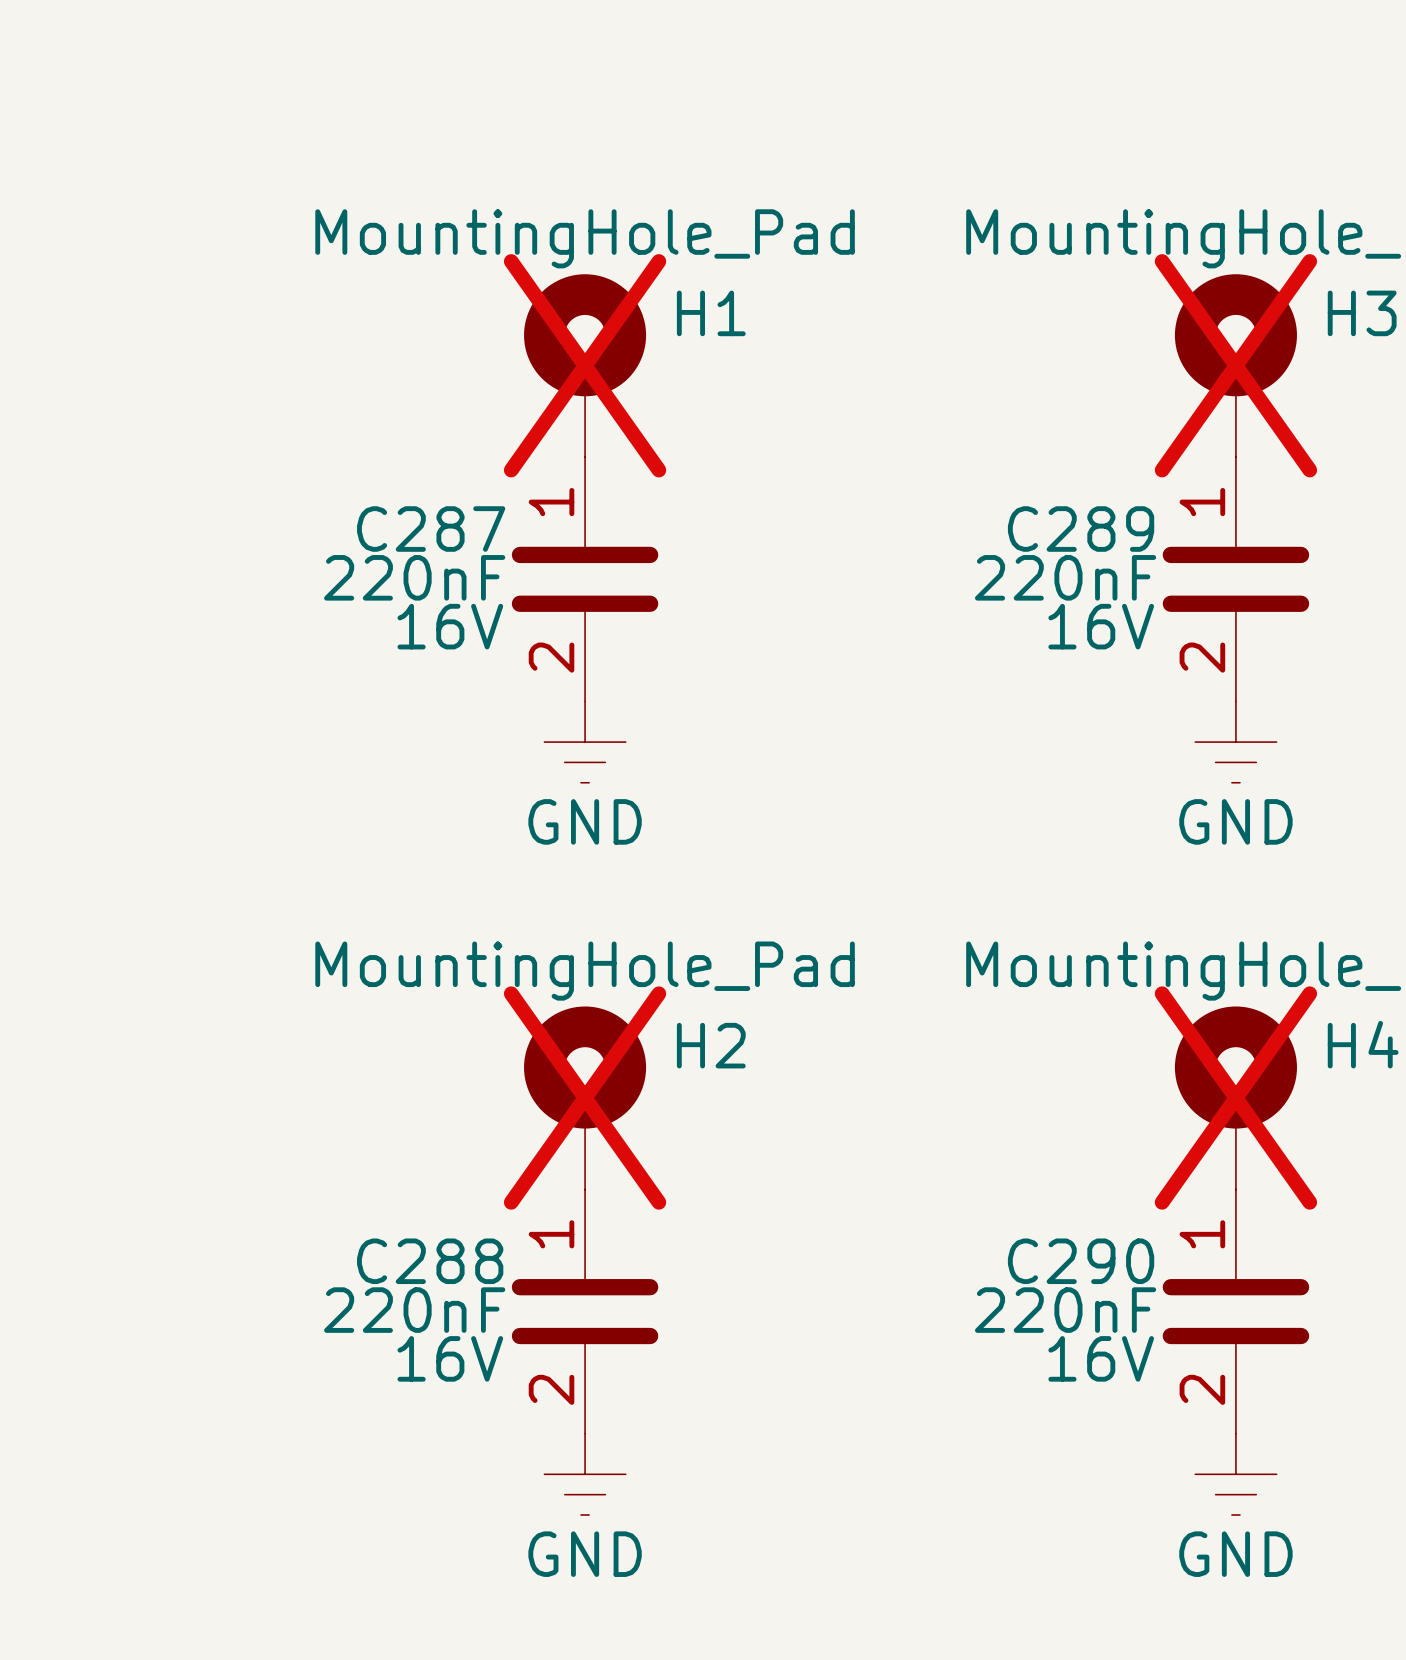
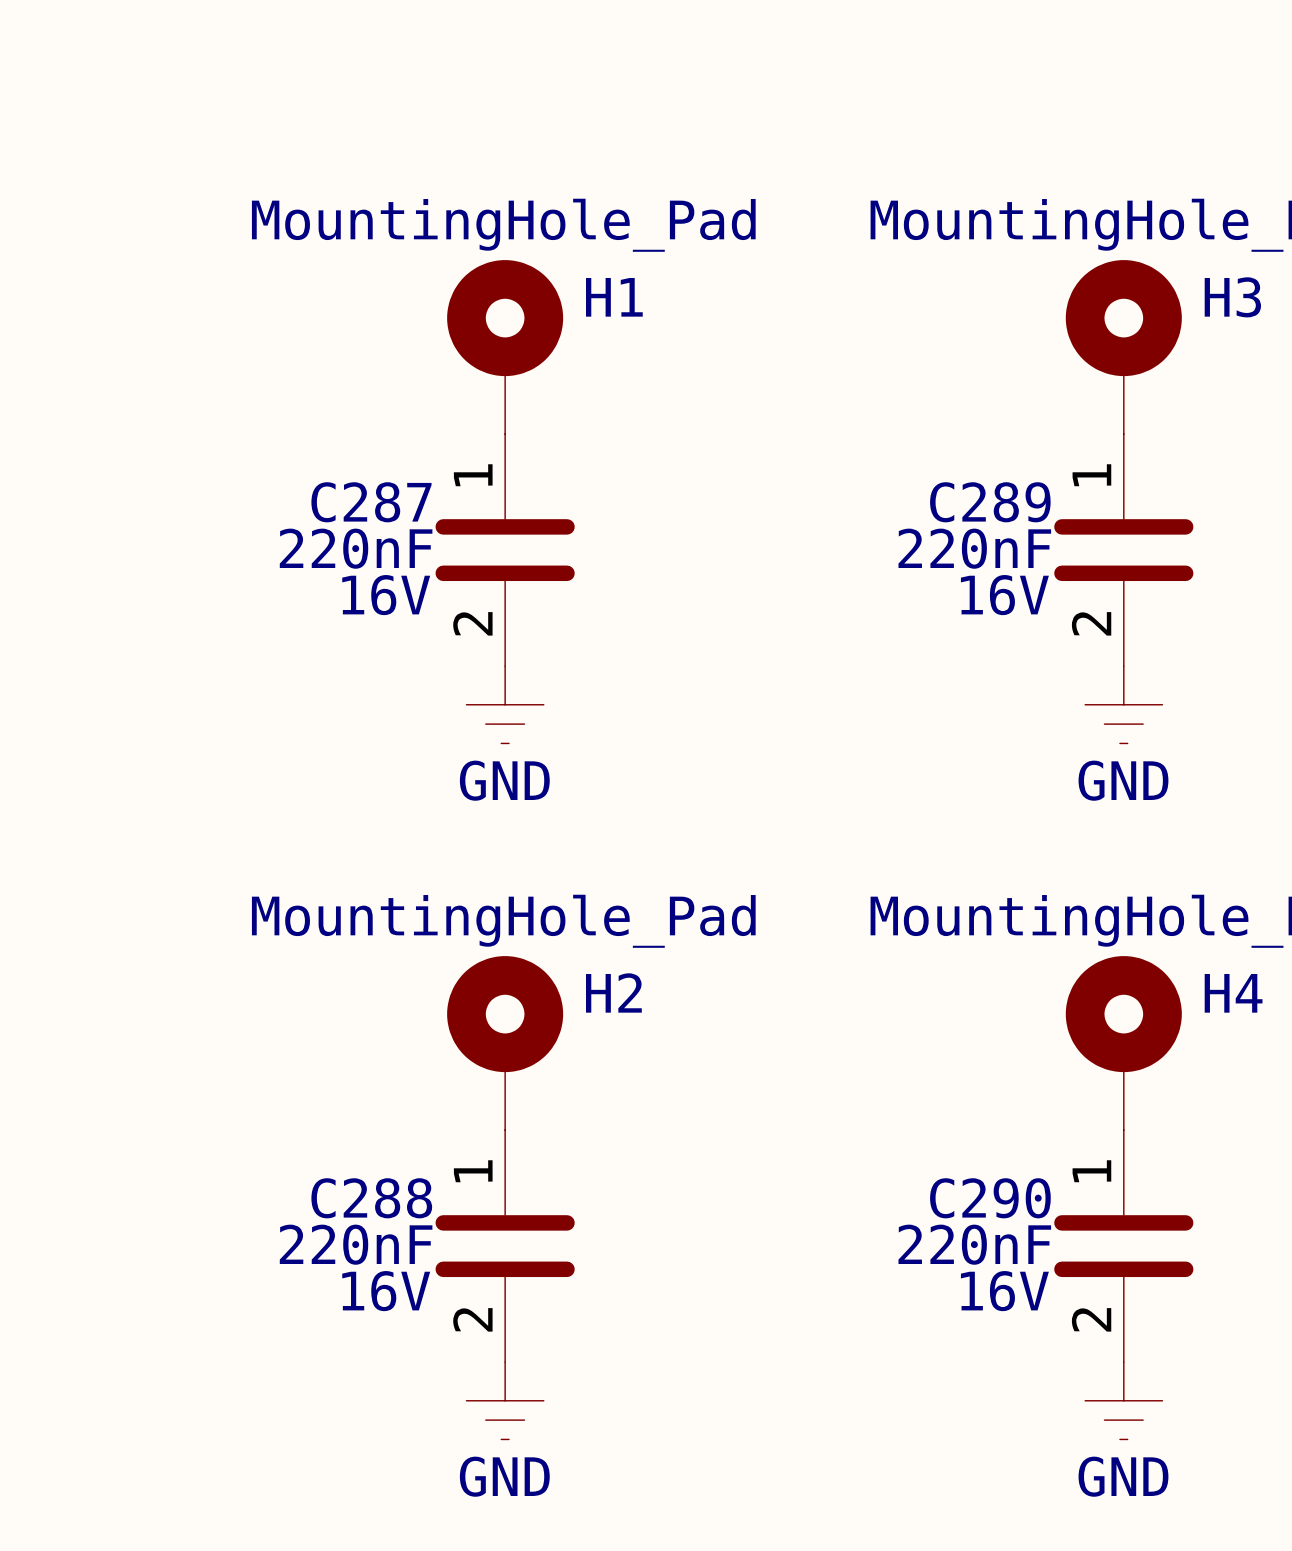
H1 do-not-place cross: (585, 365) -> none
H3 do-not-place cross: (1235, 365) -> none
H2 do-not-place cross: (585, 1098) -> none
H4 do-not-place cross: (1235, 1098) -> none

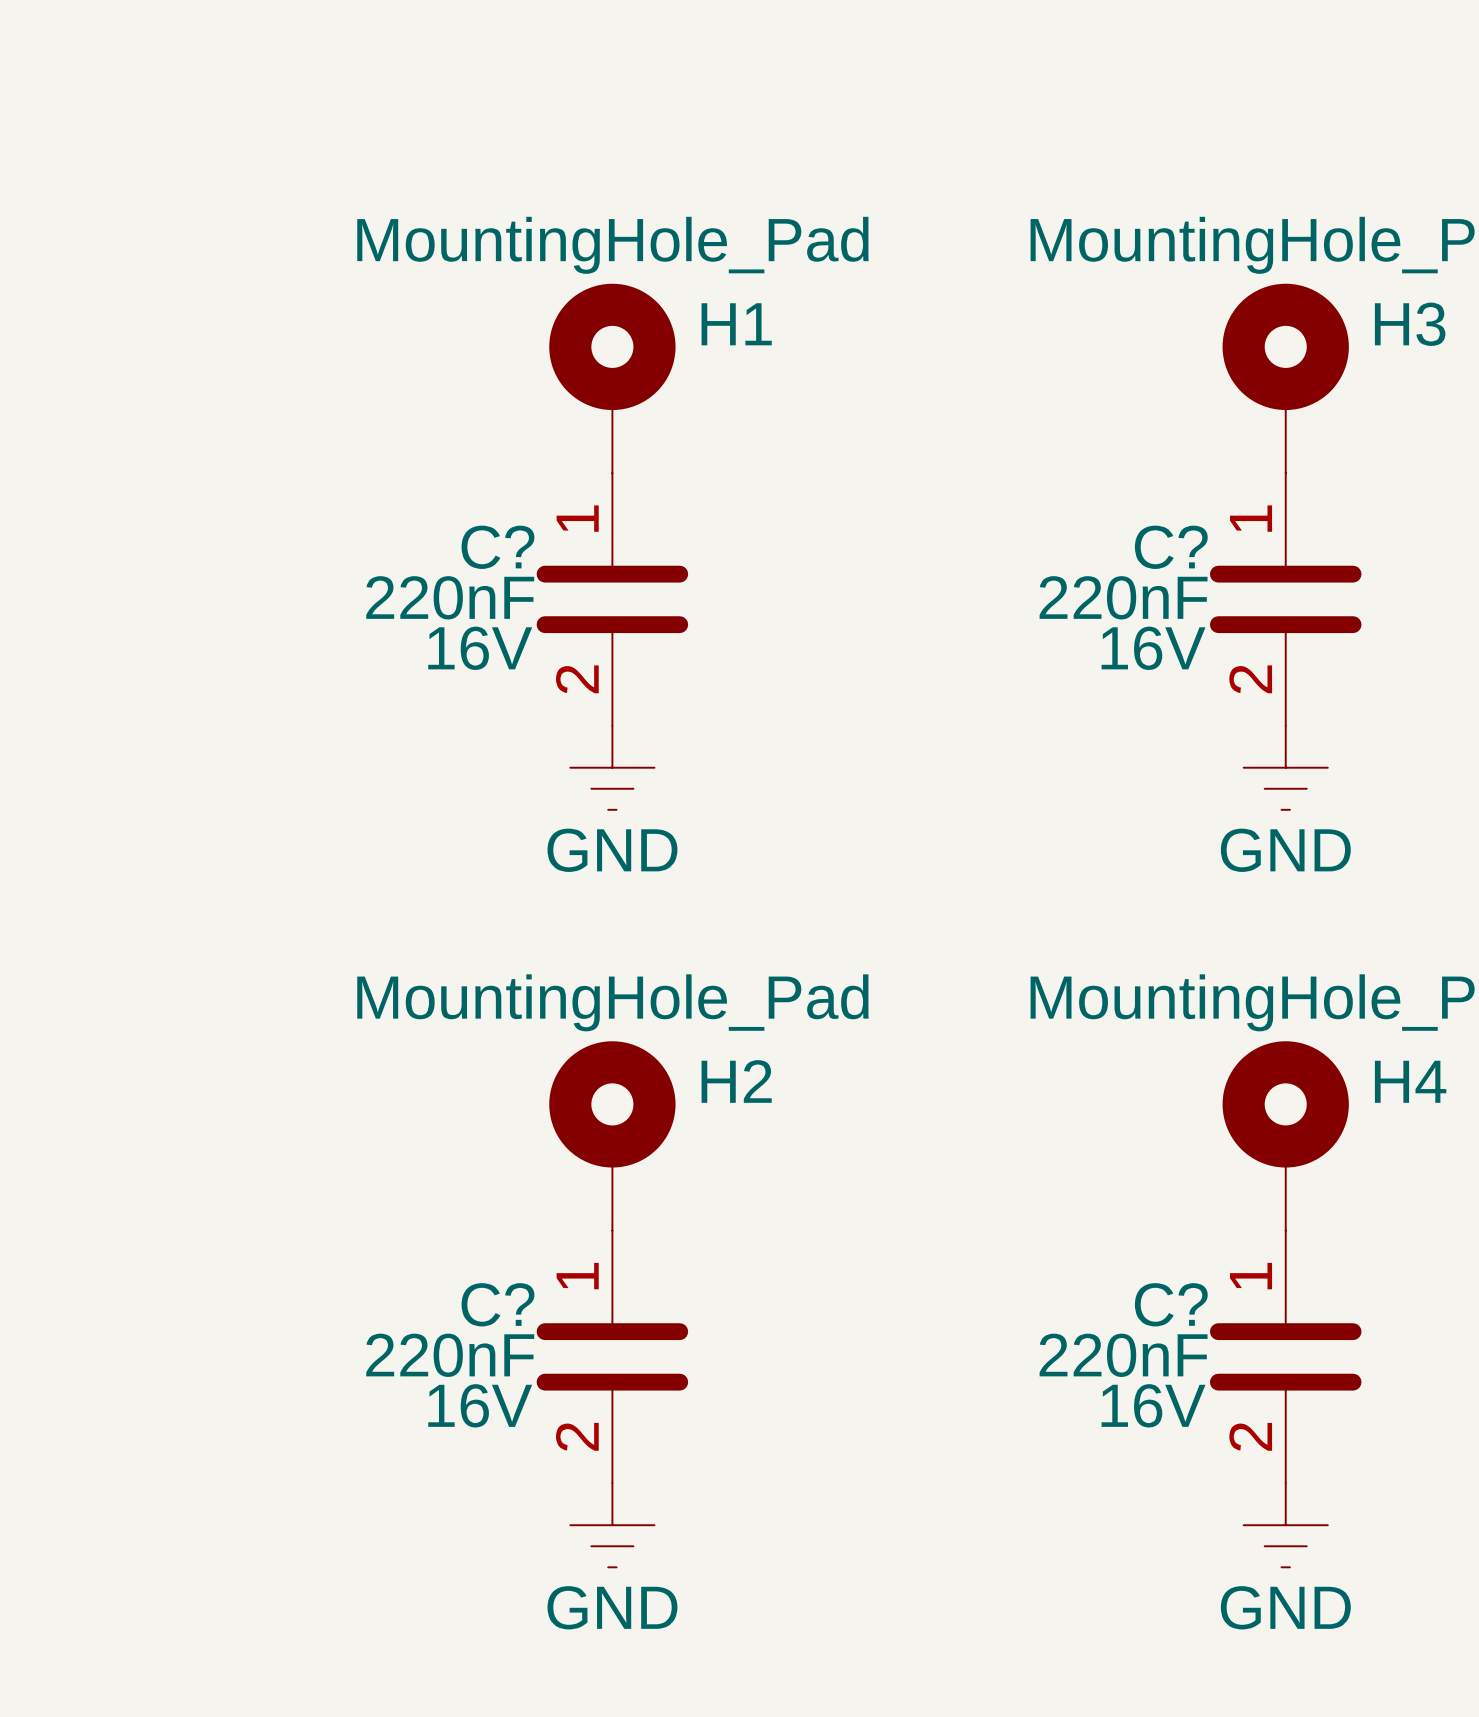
C287 name: C287 (371, 502) -> C? (497, 547)
C289 name: C289 (990, 502) -> C? (1171, 547)
C288 name: C288 (371, 1198) -> C? (497, 1304)
C290 name: C290 (990, 1198) -> C? (1171, 1304)

